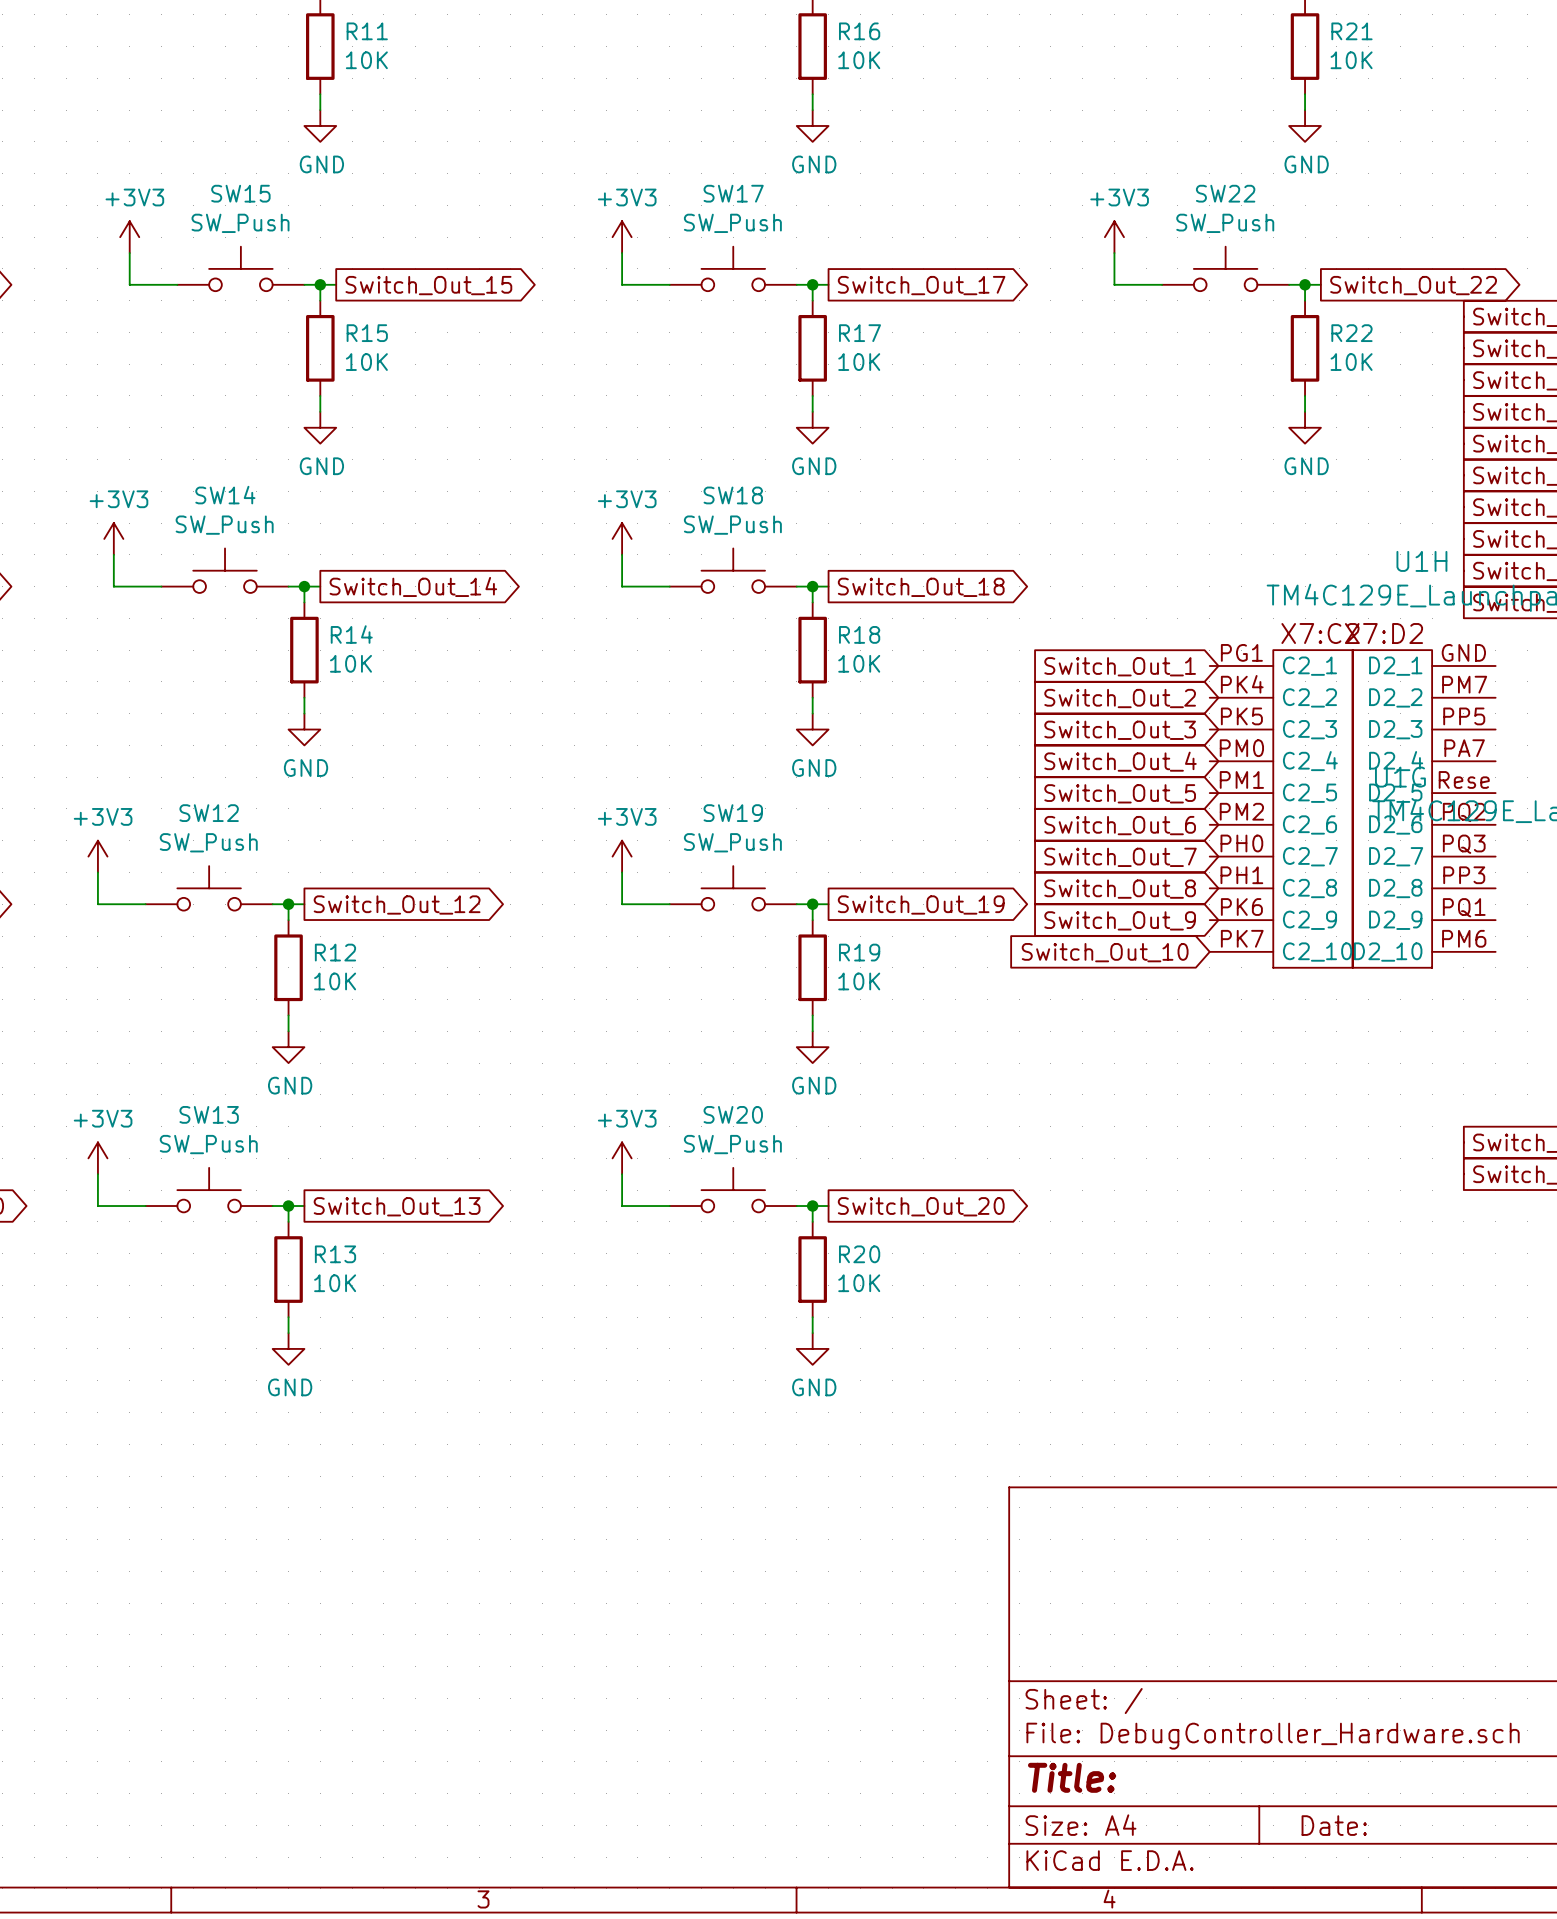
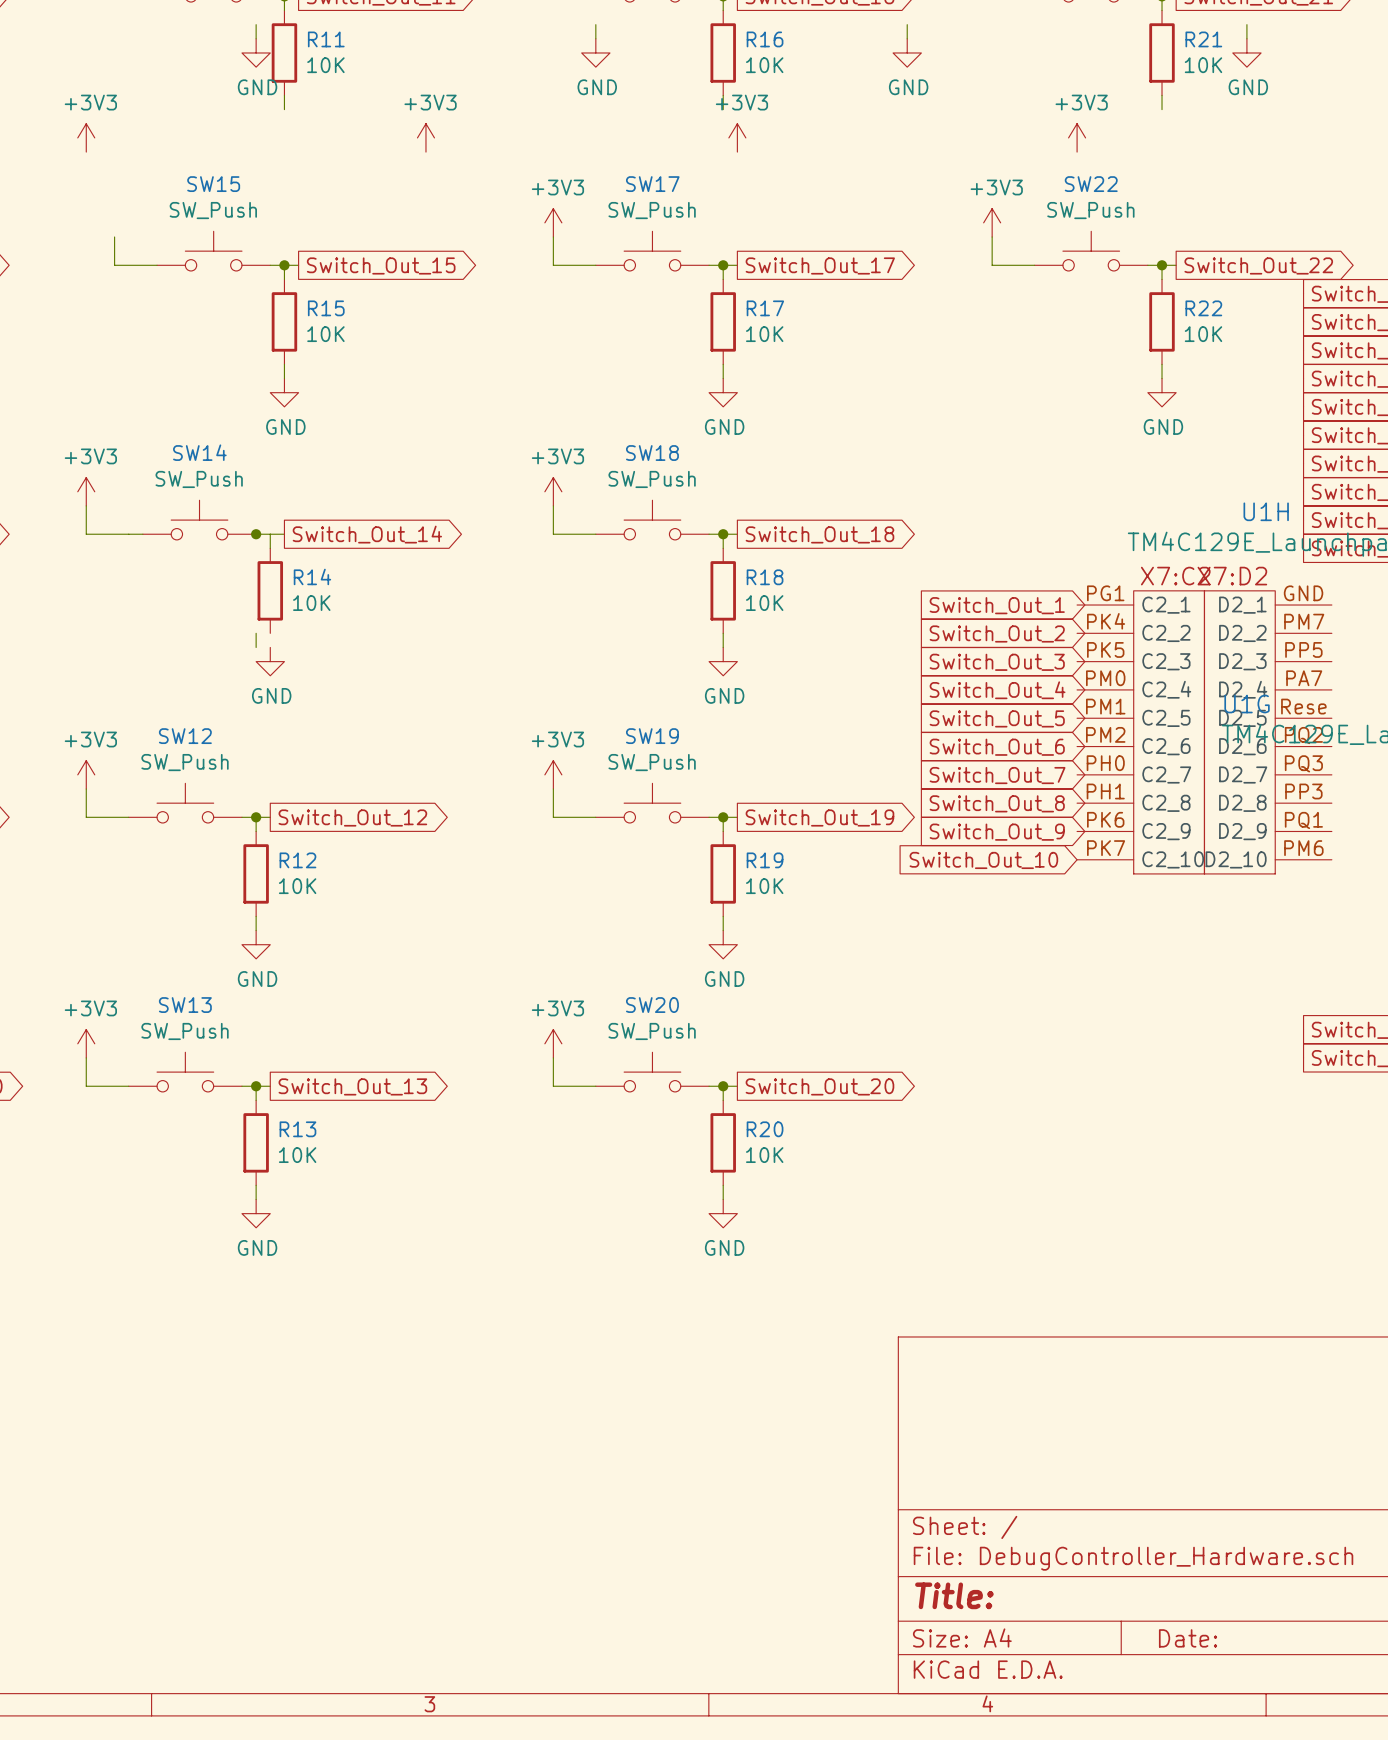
wire: none -> (256, 24) (256, 38)
wire: none -> (595, 24) (595, 38)
wire: none -> (907, 24) (907, 38)
wire: none -> (1246, 24) (1246, 38)
power symbol: none -> GND (595, 52)
power symbol: none -> GND (907, 52)
power symbol position: GND (320, 125) -> GND (256, 52)
power symbol: GND (812, 125) -> none
power symbol position: GND (1305, 125) -> GND (1246, 52)
power symbol: none -> +3V3 (425, 137)
power symbol: none -> +3V3 (737, 137)
power symbol: none -> +3V3 (1077, 137)
power symbol position: +3V3 (129, 237) -> +3V3 (86, 137)
power symbol position: +3V3 (113, 538) -> +3V3 (86, 491)
wire: (113, 554) (113, 586) -> (86, 505) (86, 534) (100, 534)
junction position: (304, 586) -> (256, 534)
wire: (304, 697) (304, 713) -> (256, 633) (256, 647)

